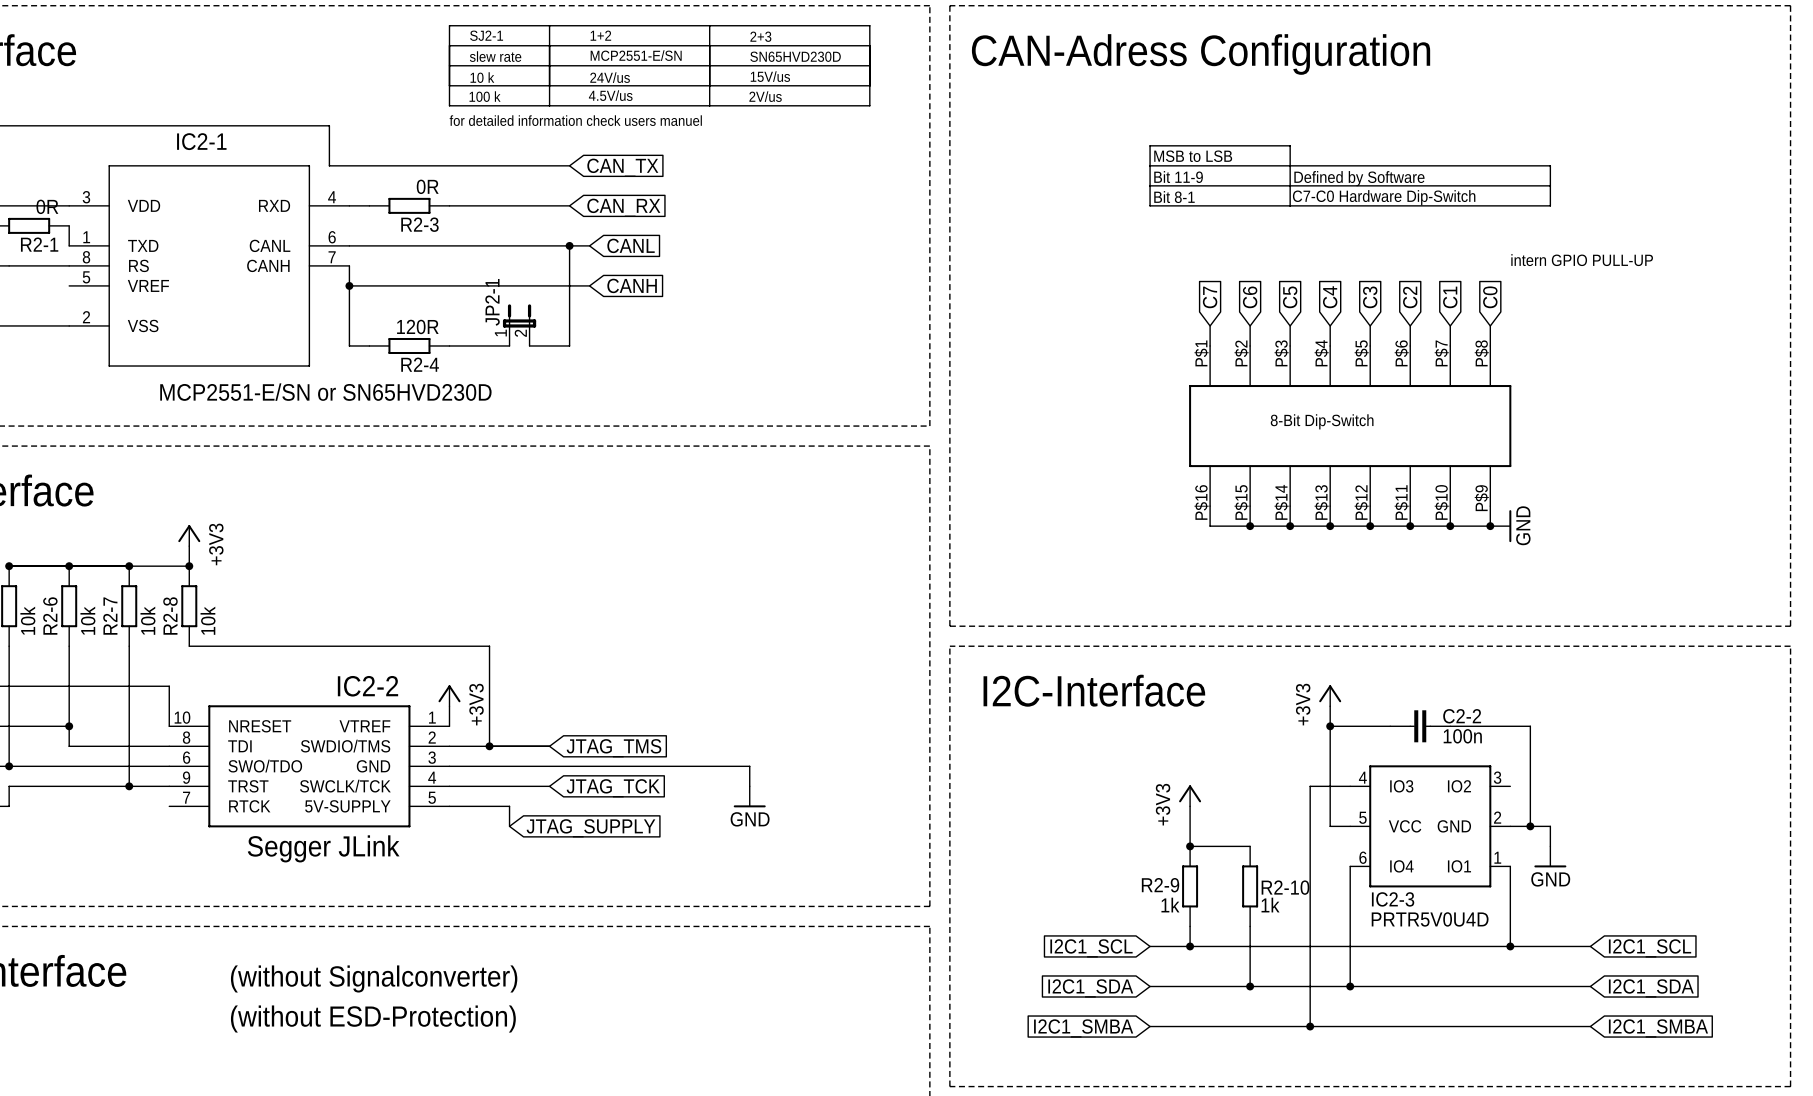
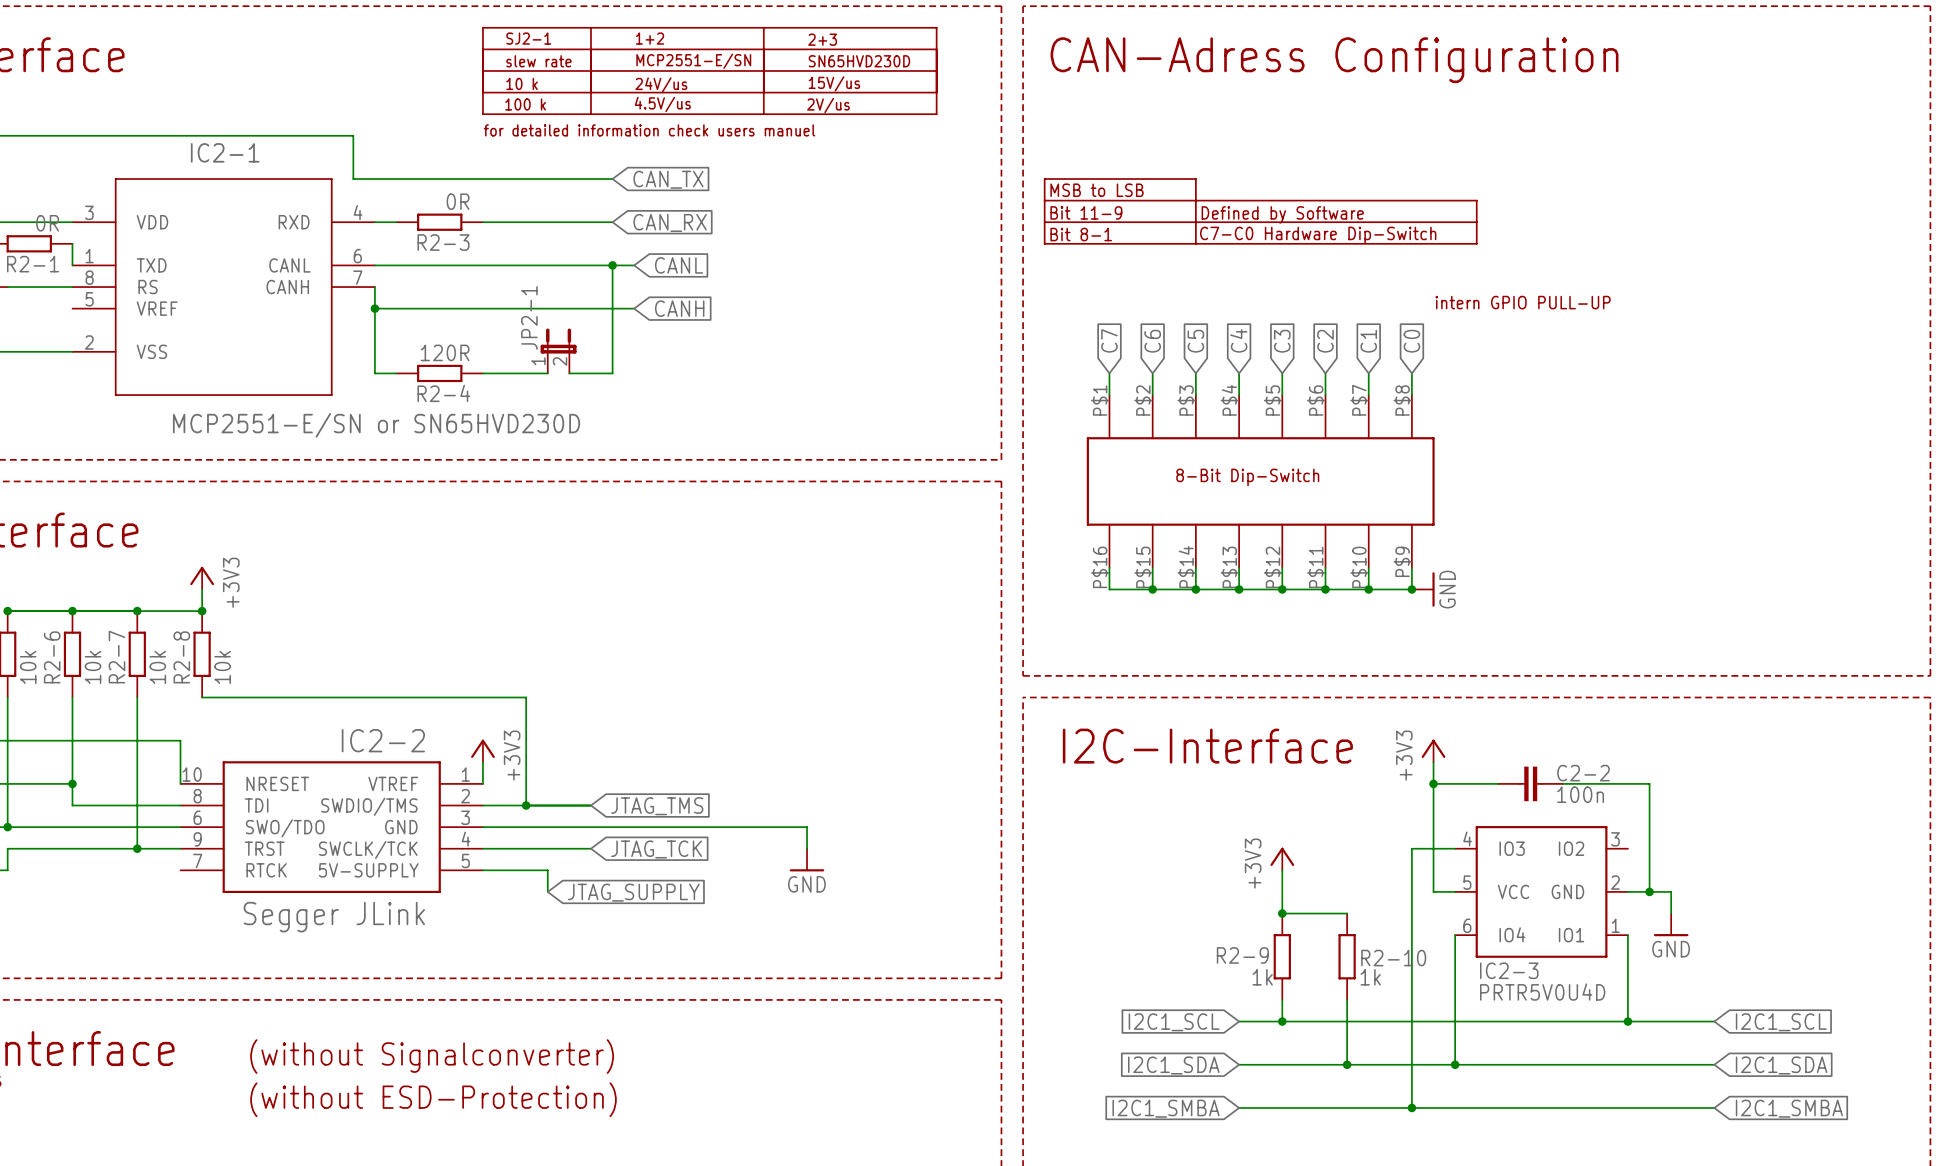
text position: MSB to LSB (1193, 156) -> MSB to LSB (1097, 190)
line: (1150, 165) (1550, 165) (1550, 205) (1370, 205) -> none
text position: Bit 11-9 (1178, 177) -> Bit 11-9 (1086, 212)
text position: Defined by Software (1359, 178) -> Defined by Software (1282, 214)
line: none -> (1044, 200) (1239, 200)
line: (1370, 185) (1550, 185) -> (1476, 200) (1476, 243) (1044, 243) (1044, 179) (1195, 179) (1195, 243)
text position: Bit 8-1 (1174, 197) -> Bit 8-1 (1081, 234)
text position: C7-C0 Hardware Dip-Switch (1384, 197) -> C7-C0 Hardware Dip-Switch (1318, 235)
line: (1150, 205) (1150, 145) (1290, 145) (1290, 205) -> (1239, 222) (1044, 222)
text position: intern GPIO PULL-UP (1582, 260) -> intern GPIO PULL-UP (1523, 302)
global label position: C7 (1210, 297) -> C7 (1109, 340)
global label position: C6 (1250, 297) -> C6 (1152, 341)
global label position: C5 (1290, 297) -> C5 (1195, 341)
global label position: C4 (1330, 297) -> C4 (1238, 340)
global label position: C3 (1370, 297) -> C3 (1282, 341)
global label position: C2 (1410, 297) -> C2 (1325, 341)
global label position: C1 (1450, 297) -> C1 (1368, 341)
global label position: C0 (1490, 297) -> C0 (1411, 341)
wire: (1210, 325) (1210, 345) -> (1109, 373) (1109, 395)
wire: (1250, 325) (1250, 345) -> (1152, 373) (1152, 395)
wire: (1290, 325) (1290, 345) -> (1195, 373) (1195, 395)
wire: (1330, 325) (1330, 345) -> (1239, 373) (1239, 395)
wire: (1370, 325) (1370, 345) -> (1282, 373) (1282, 395)
wire: (1410, 325) (1410, 345) -> (1325, 373) (1325, 395)
wire: (1450, 325) (1450, 345) -> (1368, 373) (1368, 395)
wire: (1490, 325) (1490, 345) -> (1411, 373) (1411, 395)
text position: 8-Bit Dip-Switch (1322, 421) -> 8-Bit Dip-Switch (1247, 477)
part position: (1350, 426) -> (1260, 481)
wire: (1210, 506) (1210, 526) (1490, 526) (1490, 506) -> (1109, 567) (1109, 589) (1411, 589) (1411, 567)
wire: (1250, 506) (1250, 526) -> (1152, 567) (1152, 589)
wire: (1290, 506) (1290, 526) -> (1195, 567) (1195, 589)
wire: (1330, 506) (1330, 526) -> (1239, 567) (1239, 589)
wire: (1370, 506) (1370, 526) -> (1282, 567) (1282, 589)
wire: (1410, 506) (1410, 526) -> (1325, 567) (1325, 589)
wire: (1450, 506) (1450, 526) -> (1368, 567) (1368, 589)
junction: (1250, 526) -> none
junction: (1290, 526) -> none
junction: (1330, 526) -> none
junction: (1370, 526) -> none
junction: (1410, 526) -> none
junction: (1450, 526) -> none
junction: (1490, 526) -> none
power symbol position: GND (1500, 526) -> GND (1423, 589)
junction: none -> (1152, 589)
junction: none -> (1195, 589)
junction: none -> (1239, 589)
junction: none -> (1282, 589)
junction: none -> (1325, 589)
junction: none -> (1368, 589)
junction: none -> (1411, 589)

